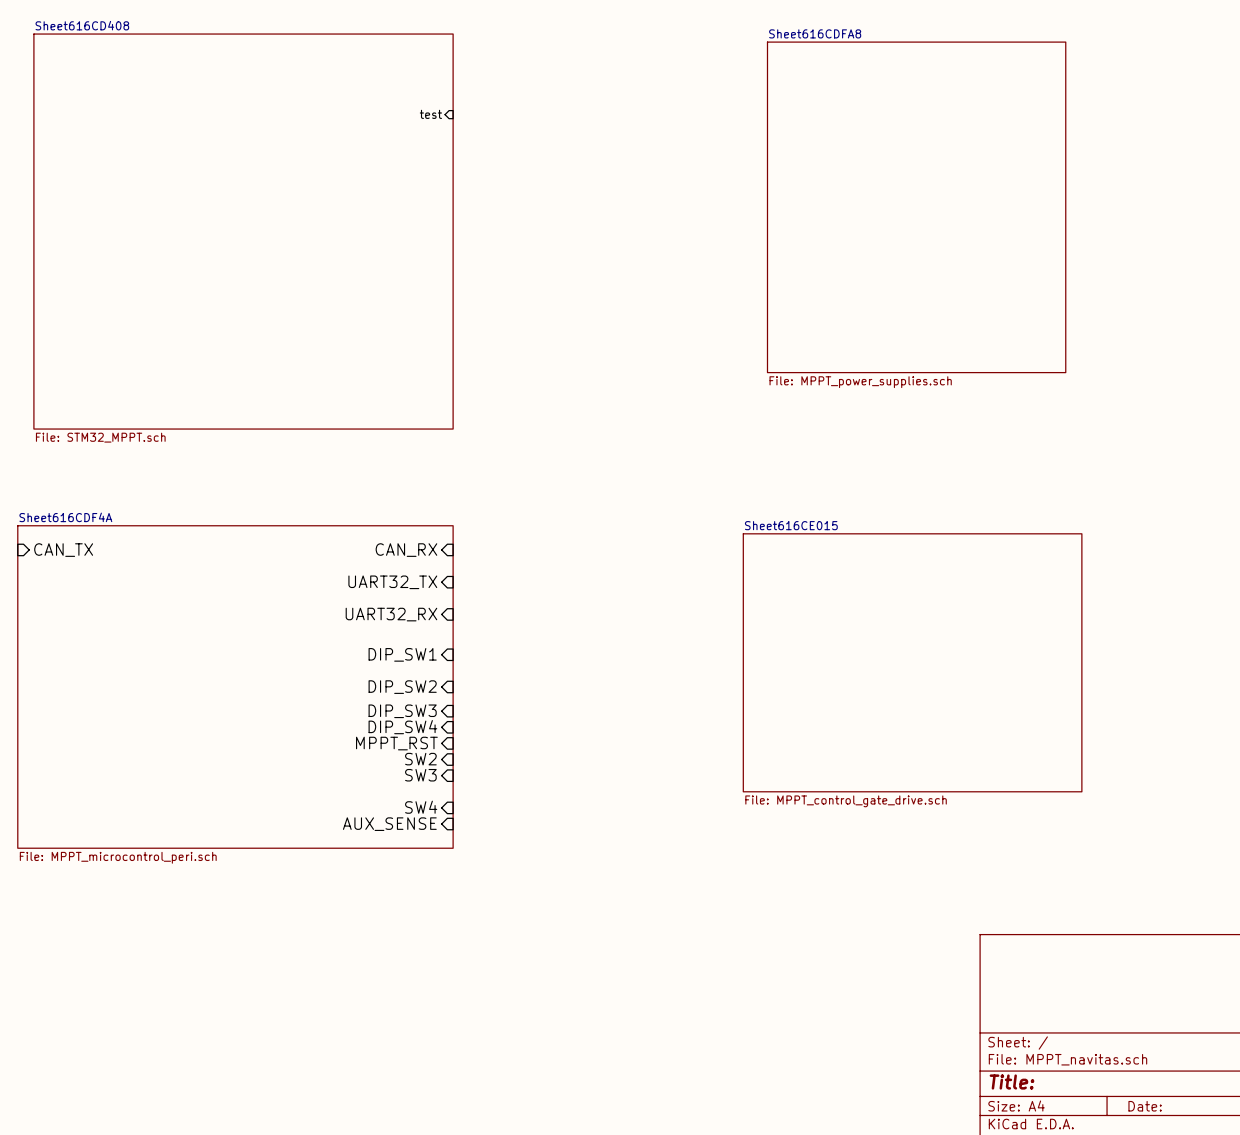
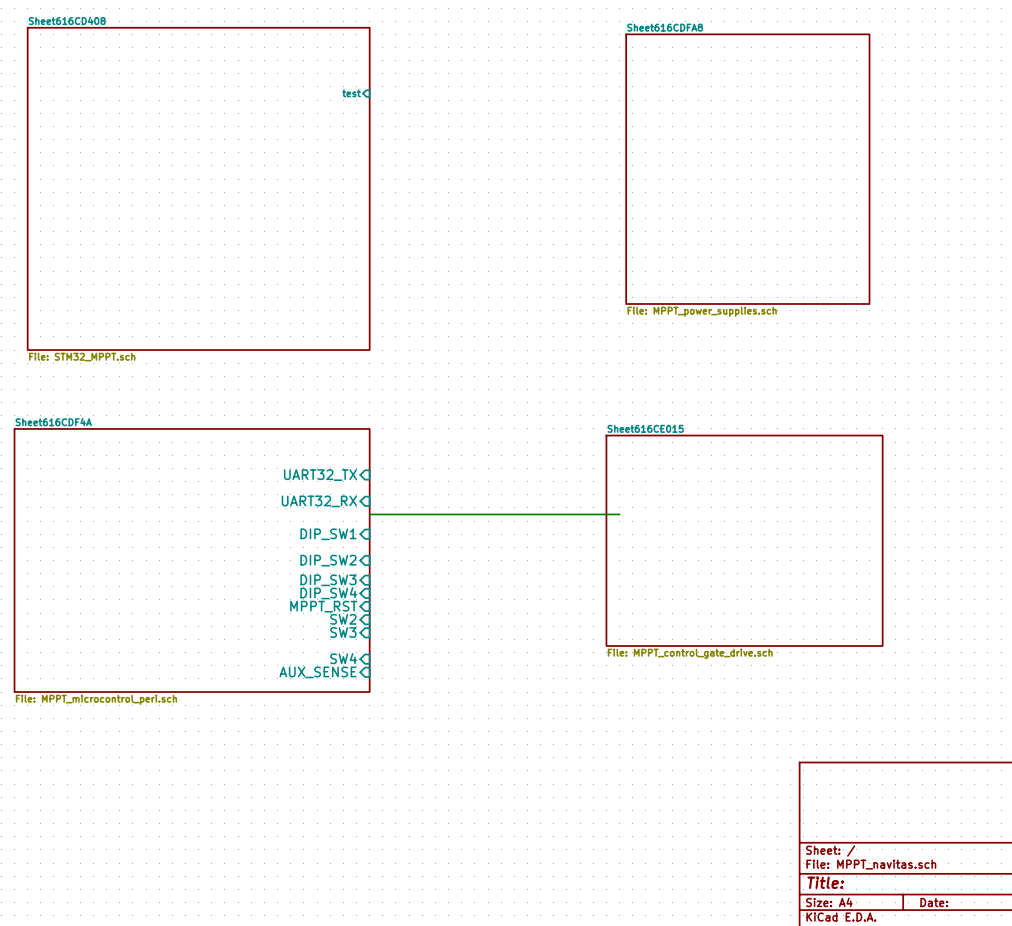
sheet pin: CAN_TX (63, 550) -> none
sheet pin: CAN_RX (406, 550) -> none
wire: none -> (369, 514) (619, 514)

